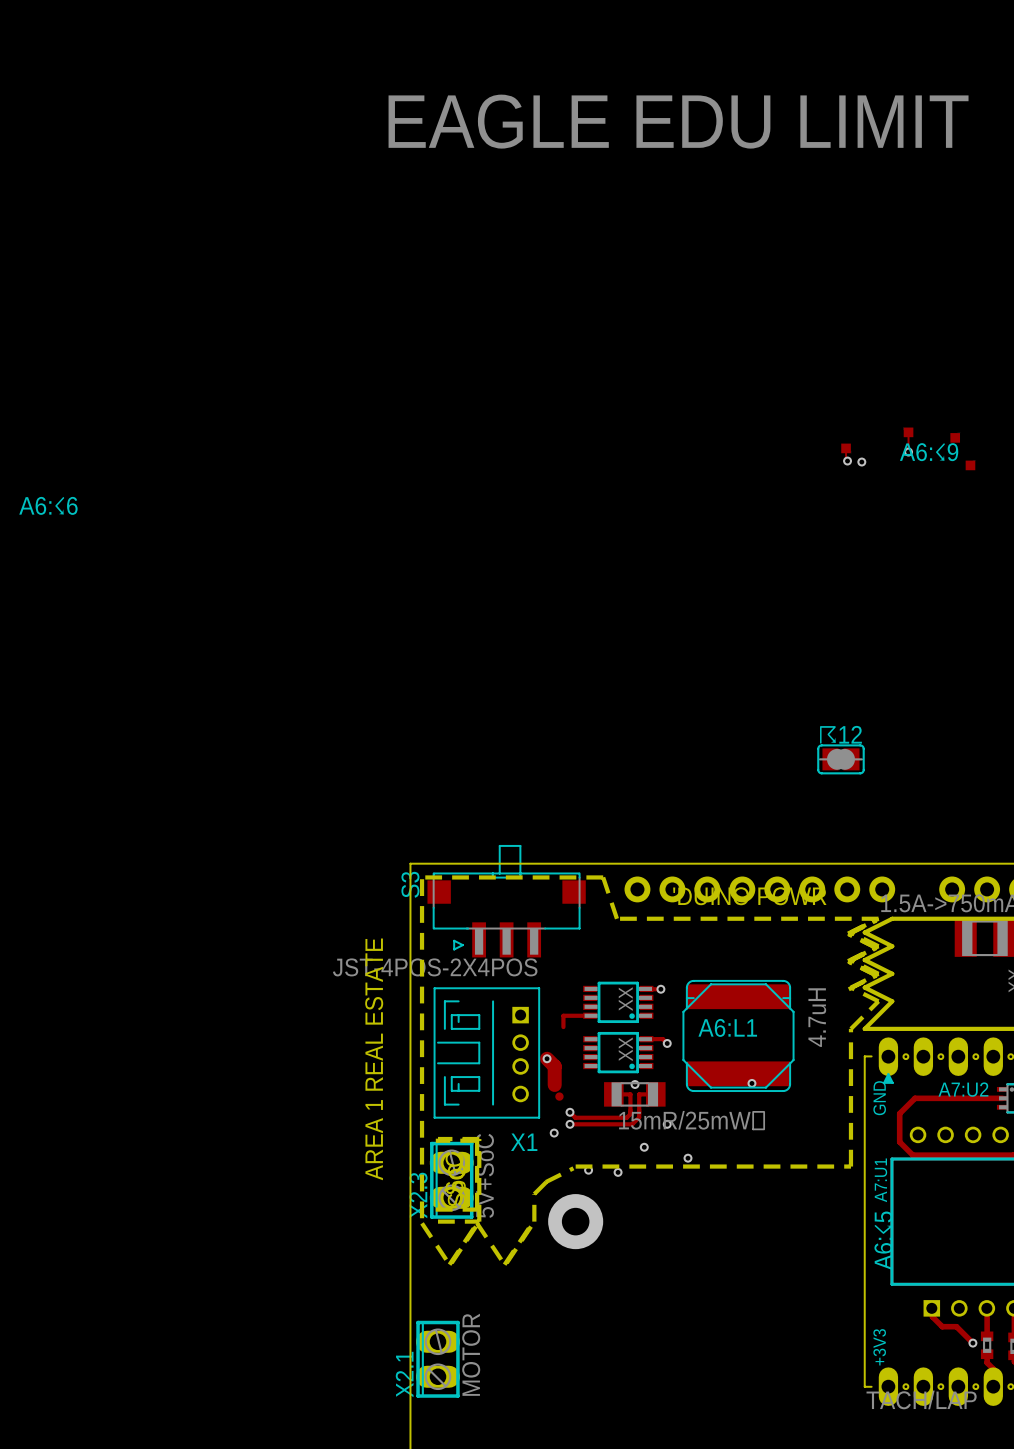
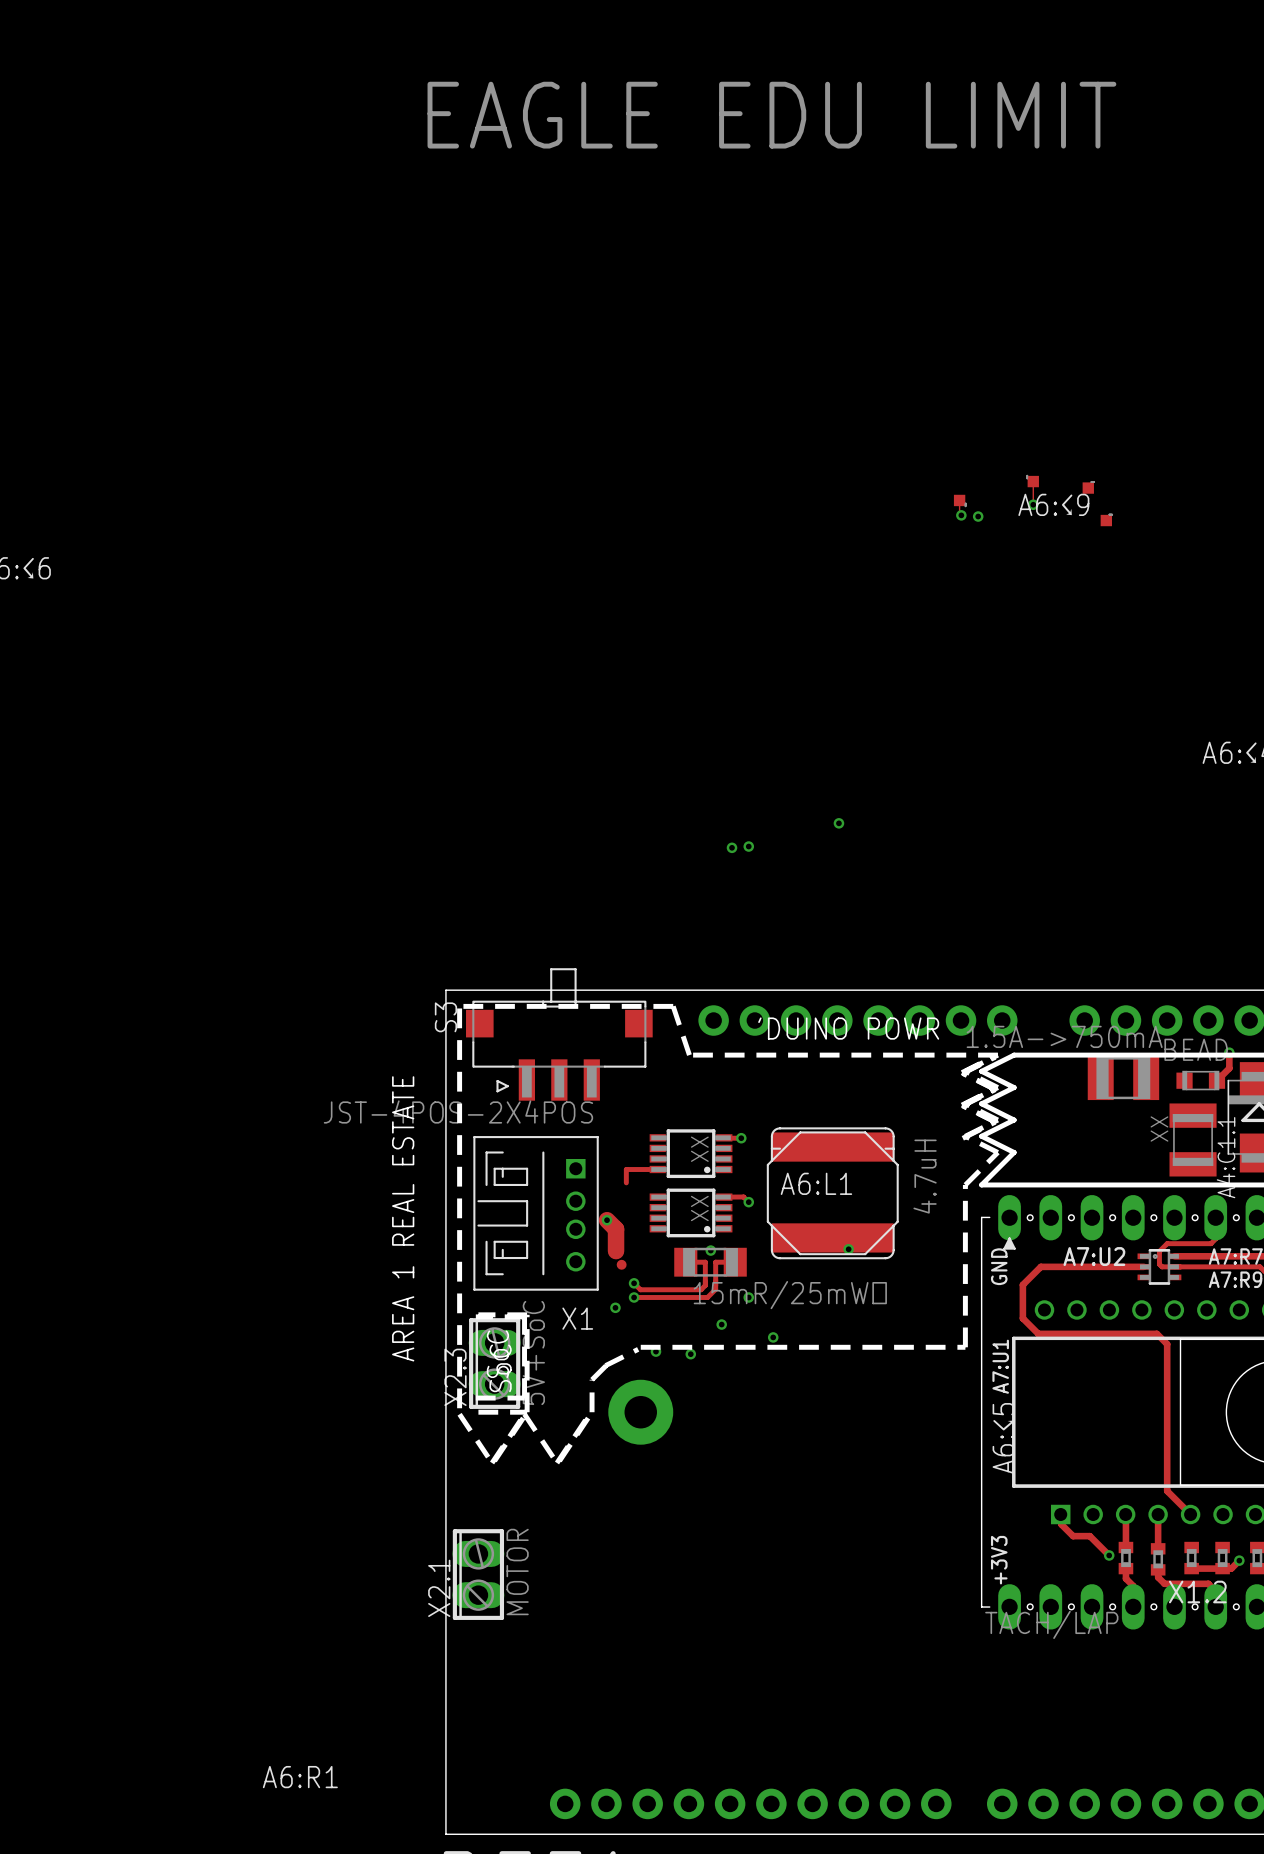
via: none -> (838, 823)
via: none -> (748, 846)
via: none -> (732, 847)
☈12: (840, 759) -> none

